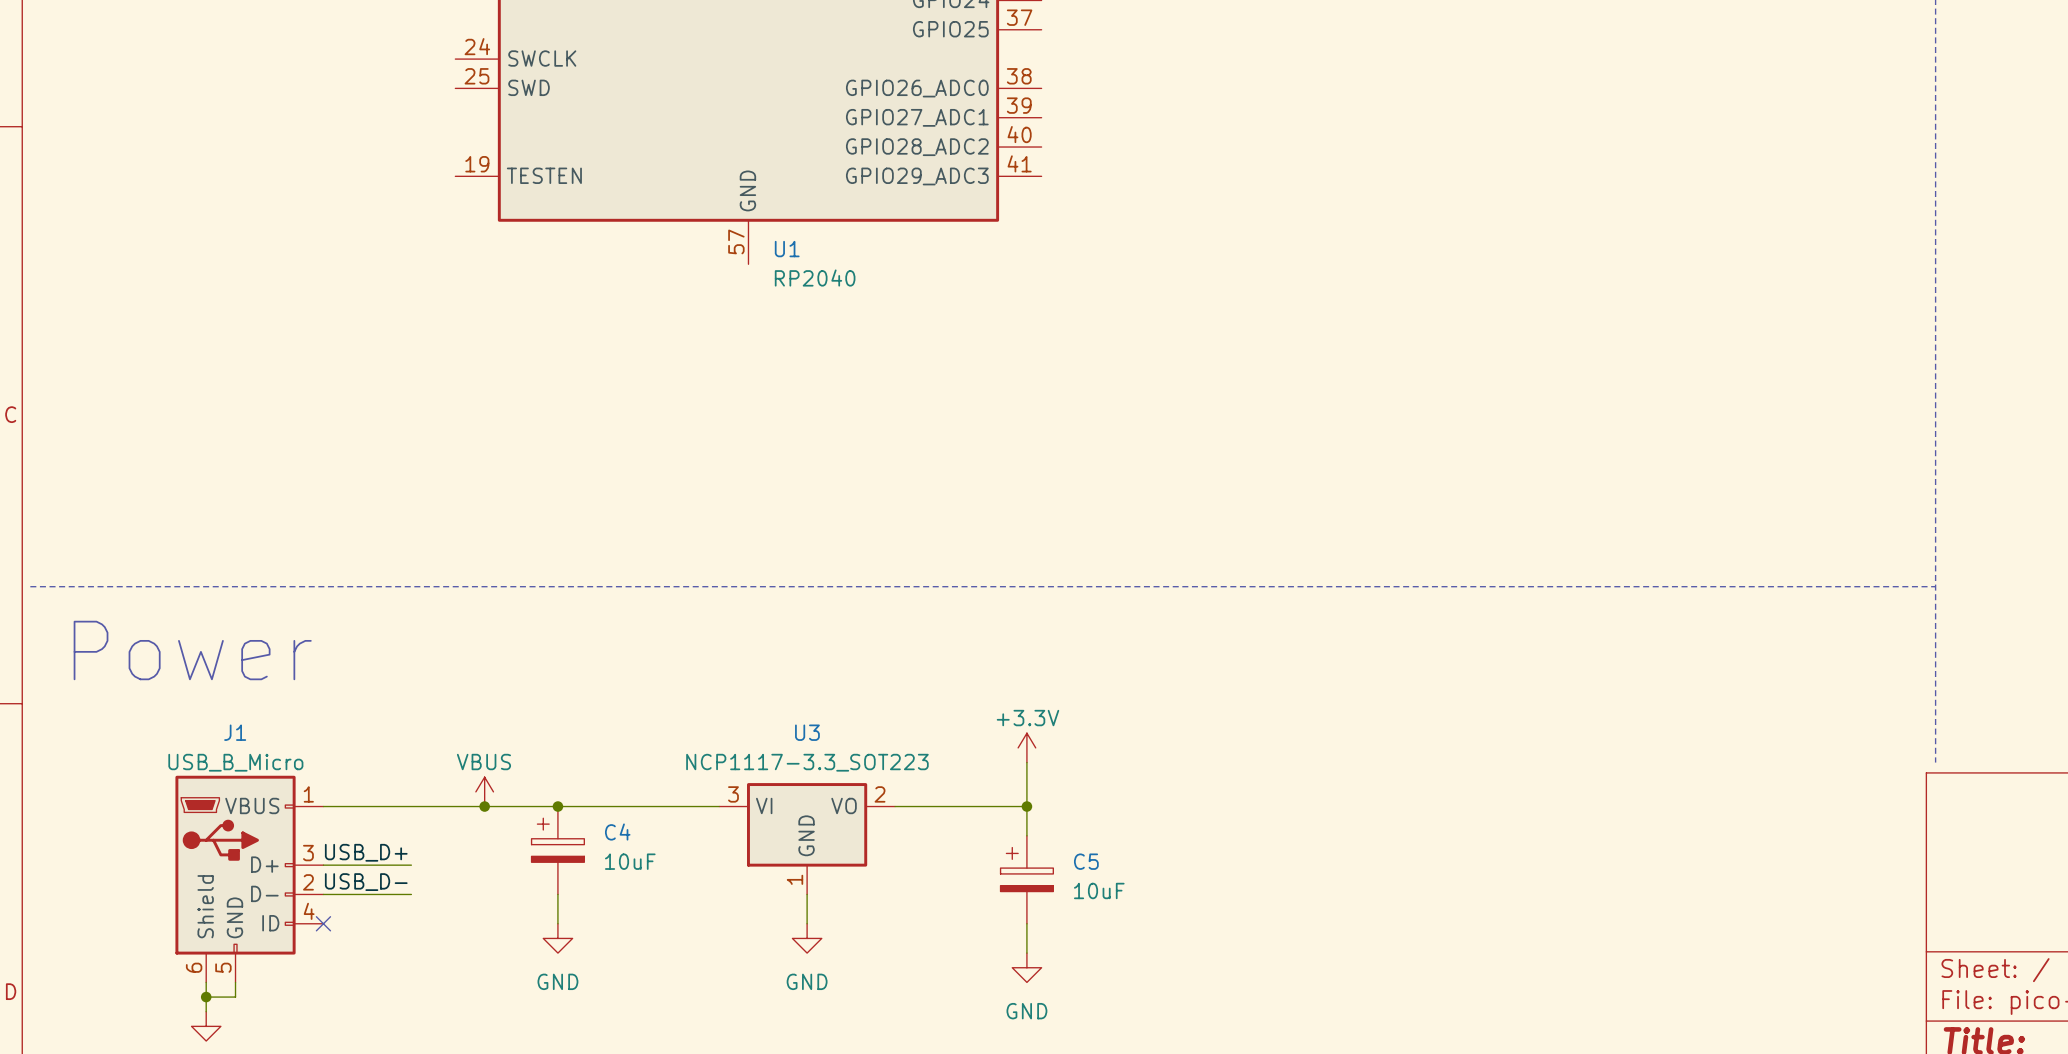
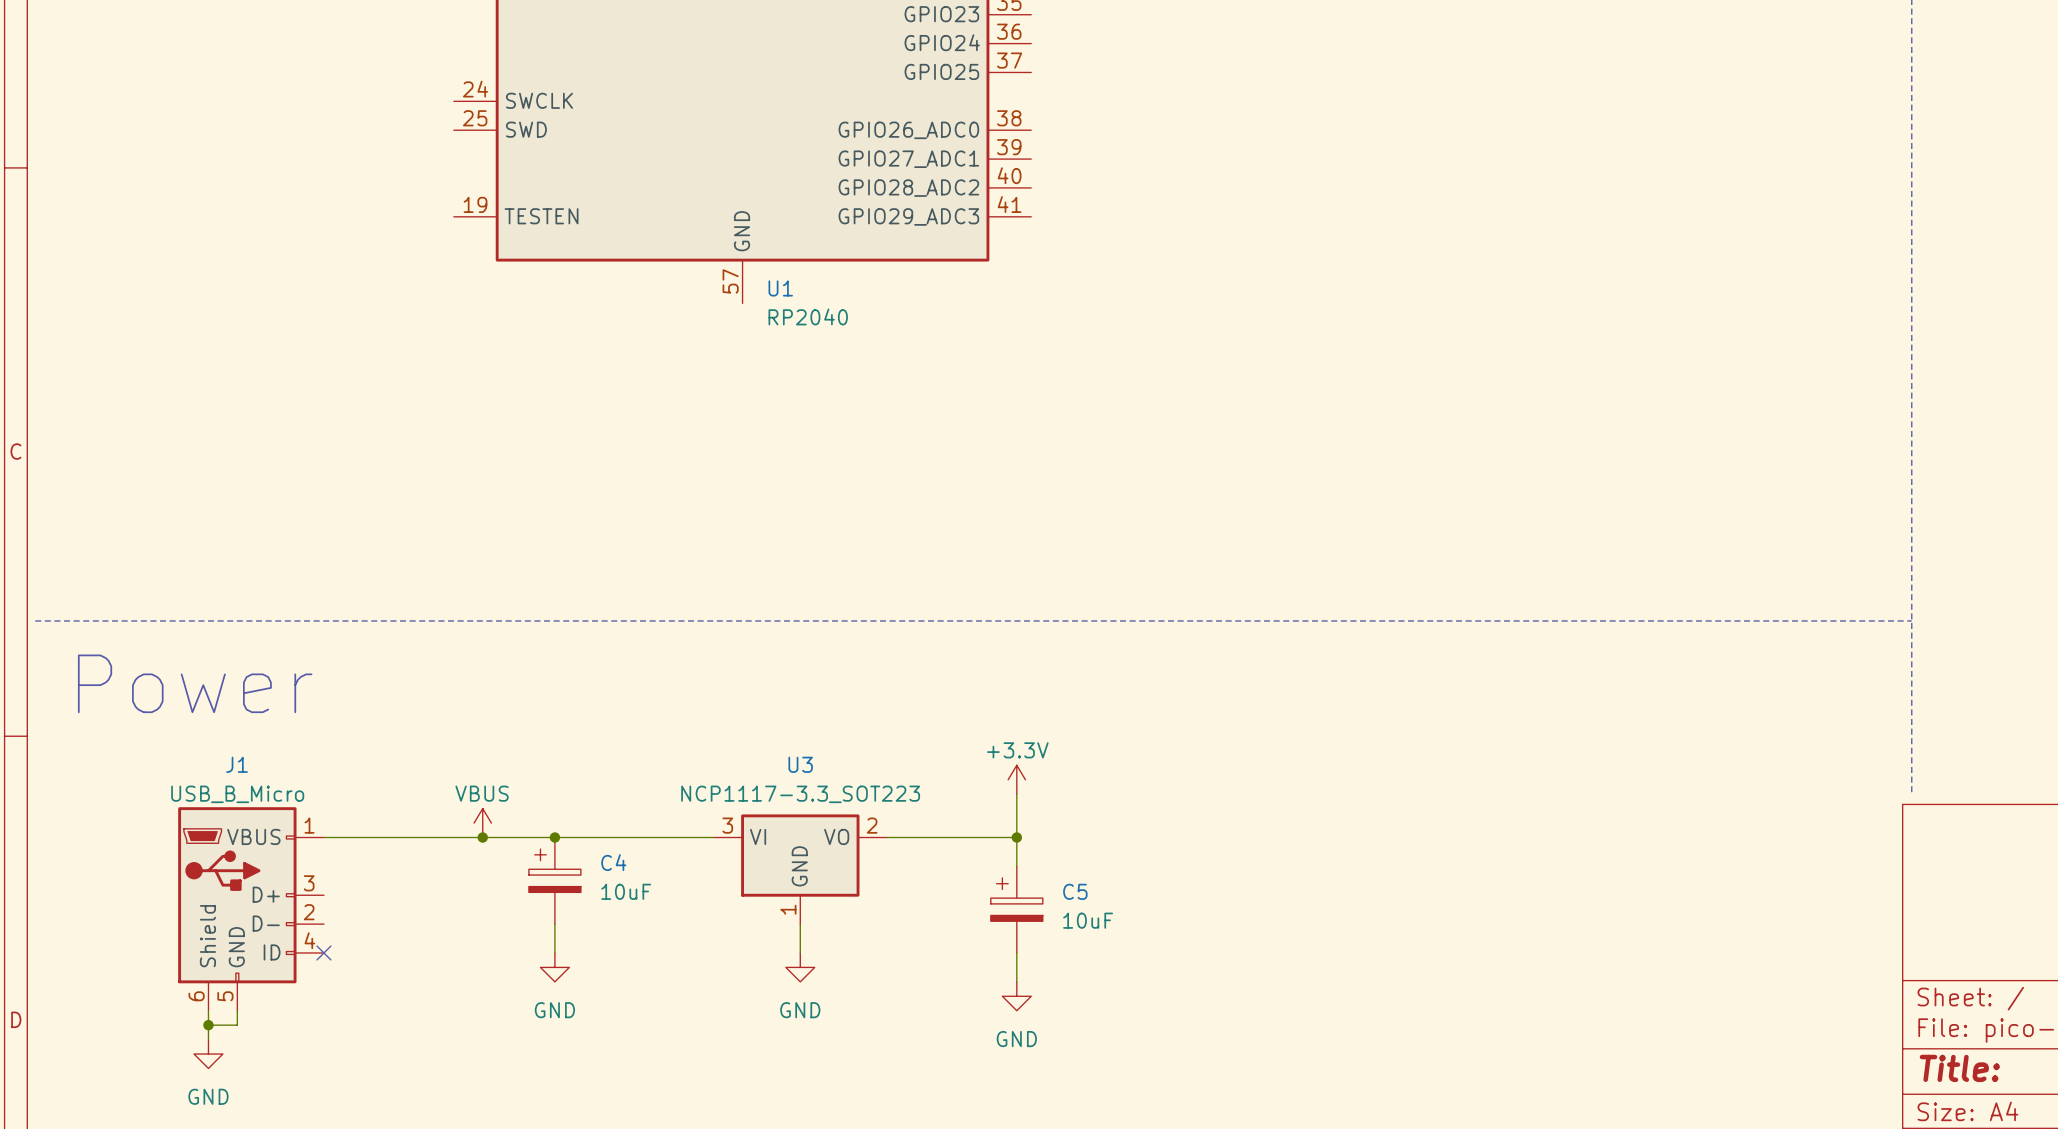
label: USB_D+ (366, 852) -> none
wire: (323, 865) (411, 865) -> none
label: USB_D- (366, 882) -> none
wire: (323, 894) (411, 894) -> none

